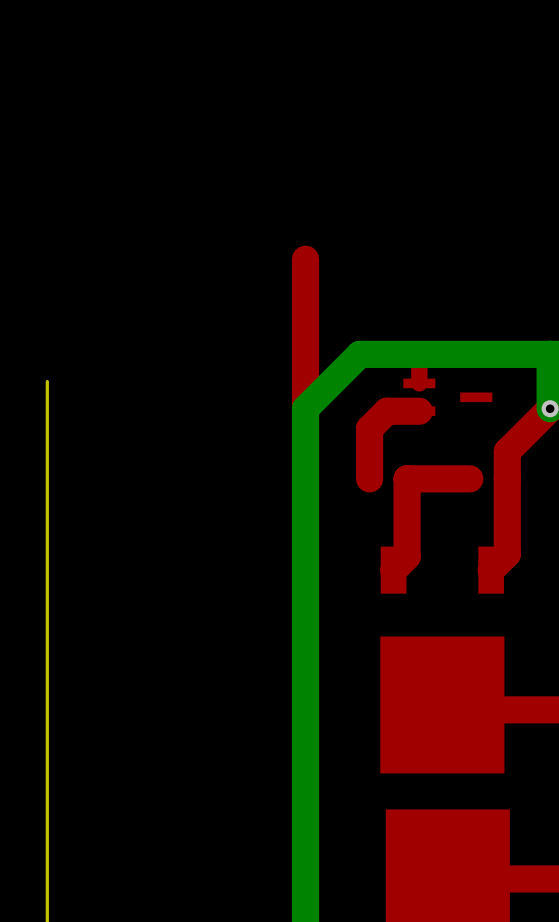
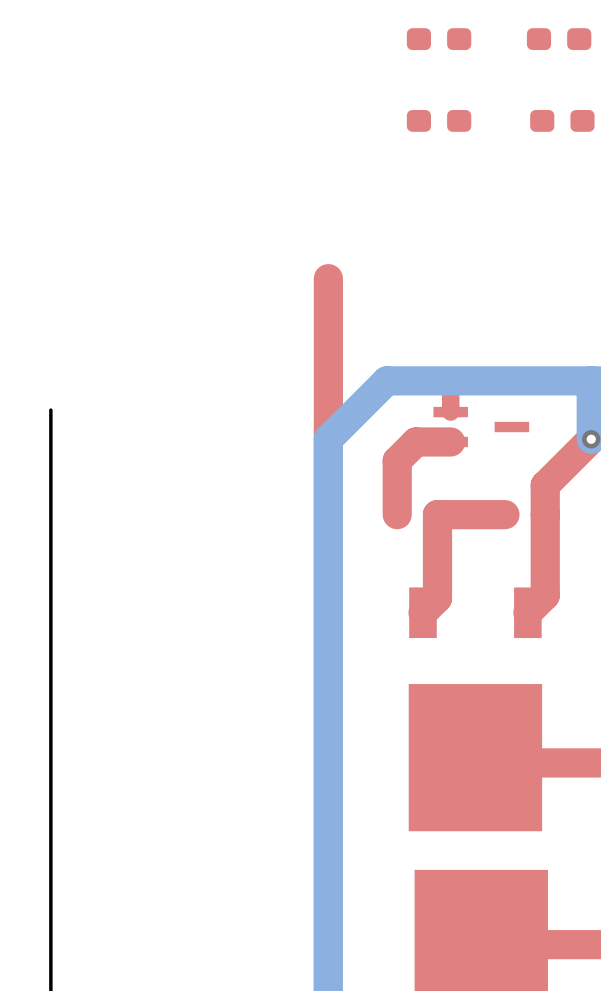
part: none -> (439, 39)
part: none -> (559, 39)
part: none -> (439, 120)
part: none -> (562, 120)

